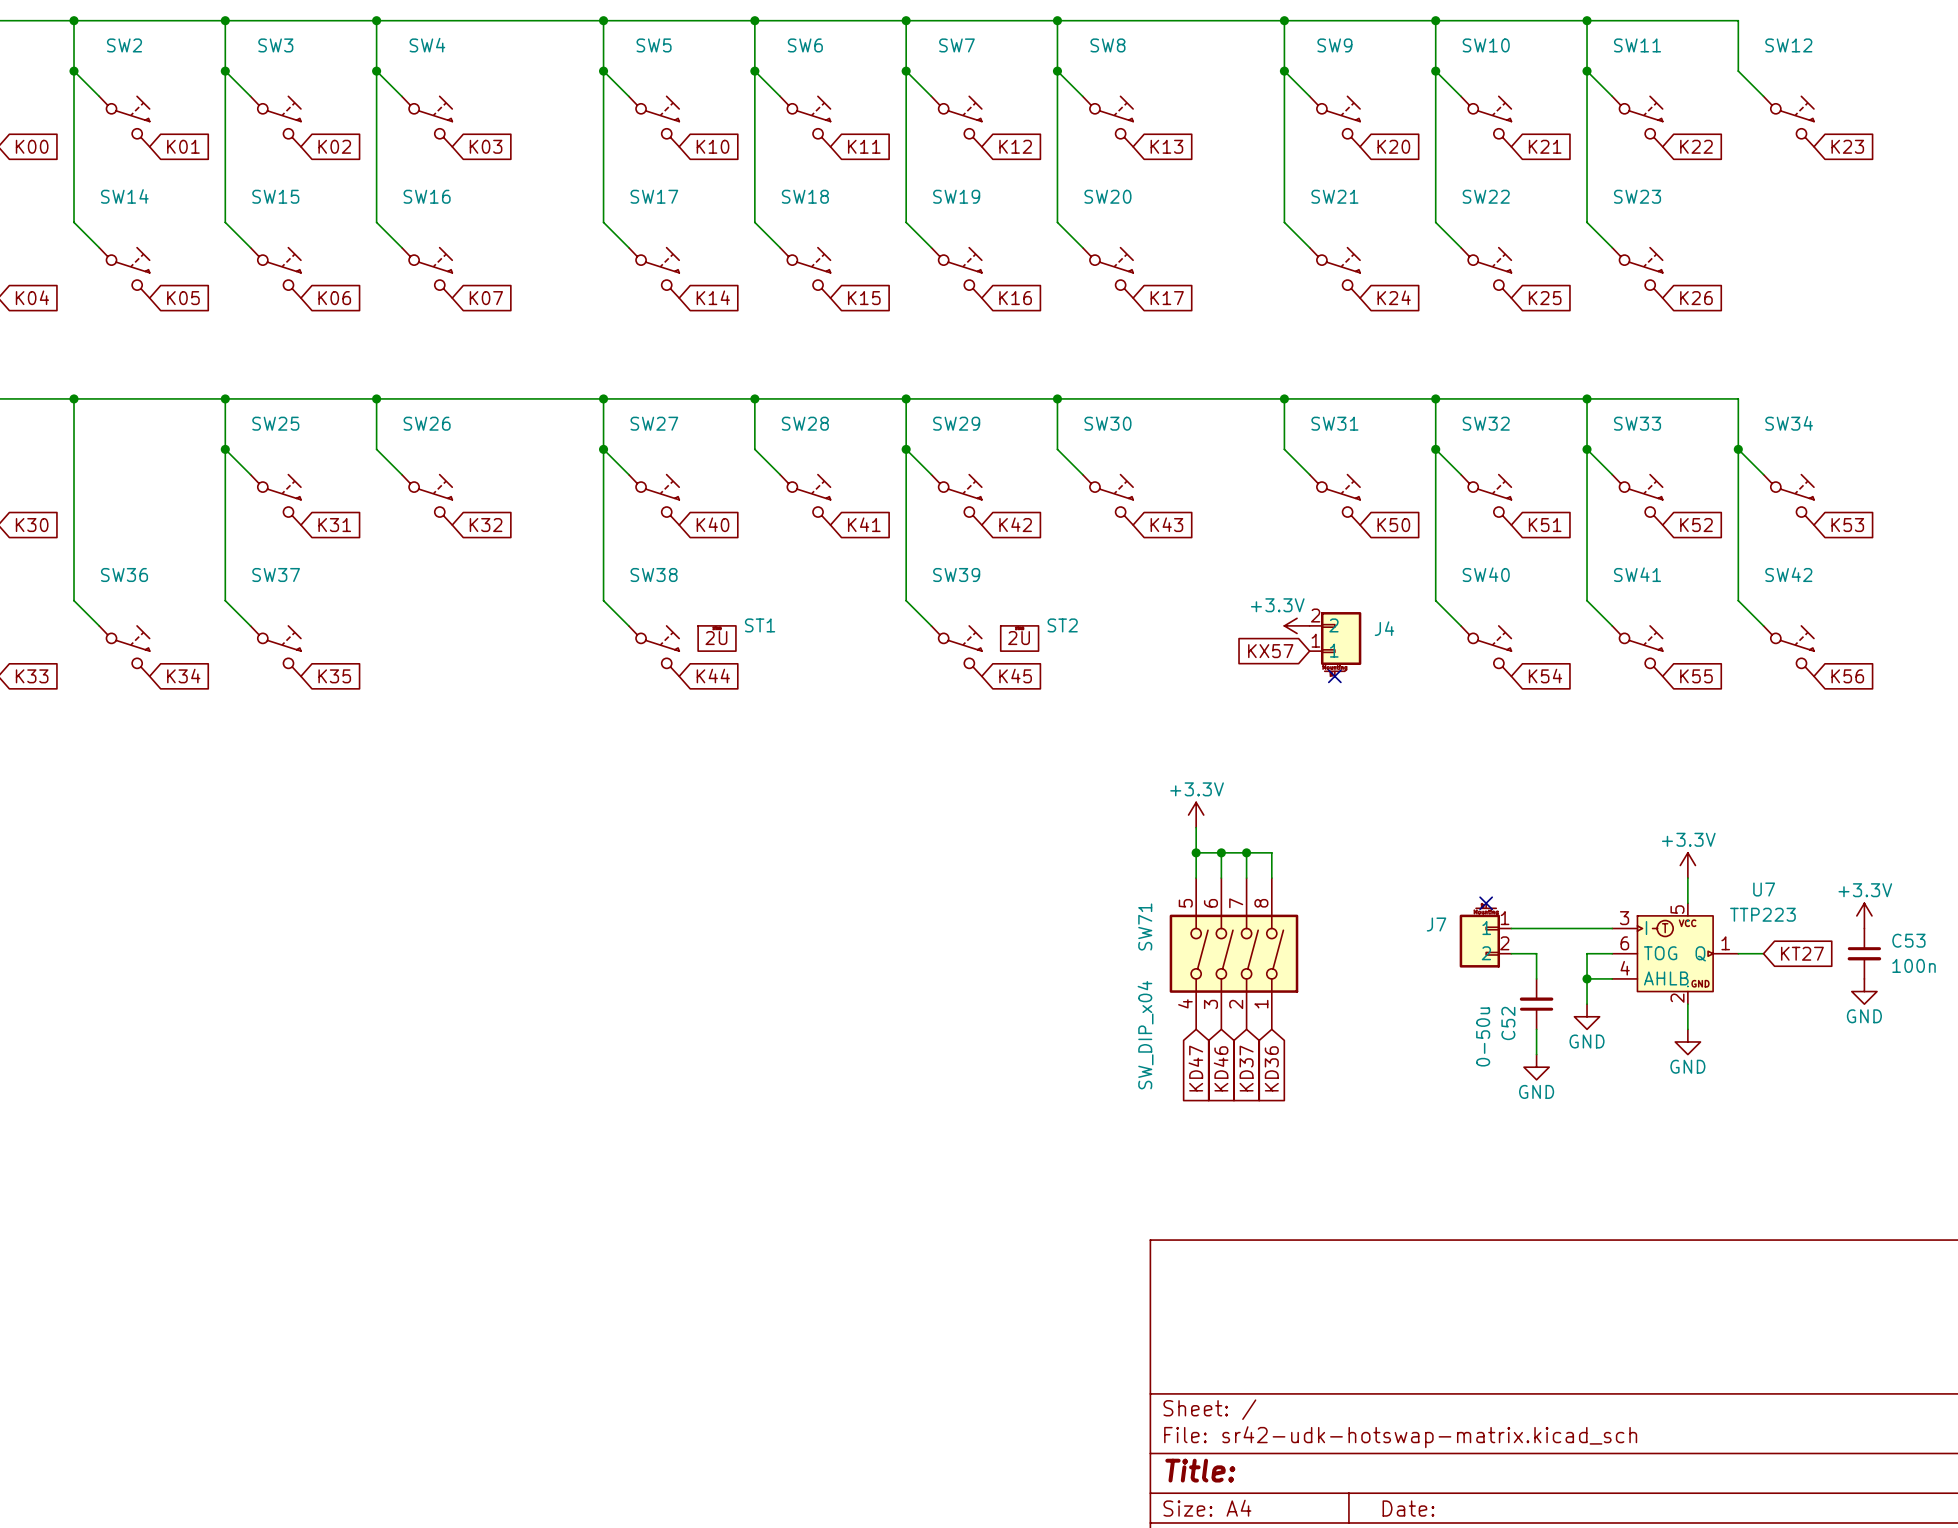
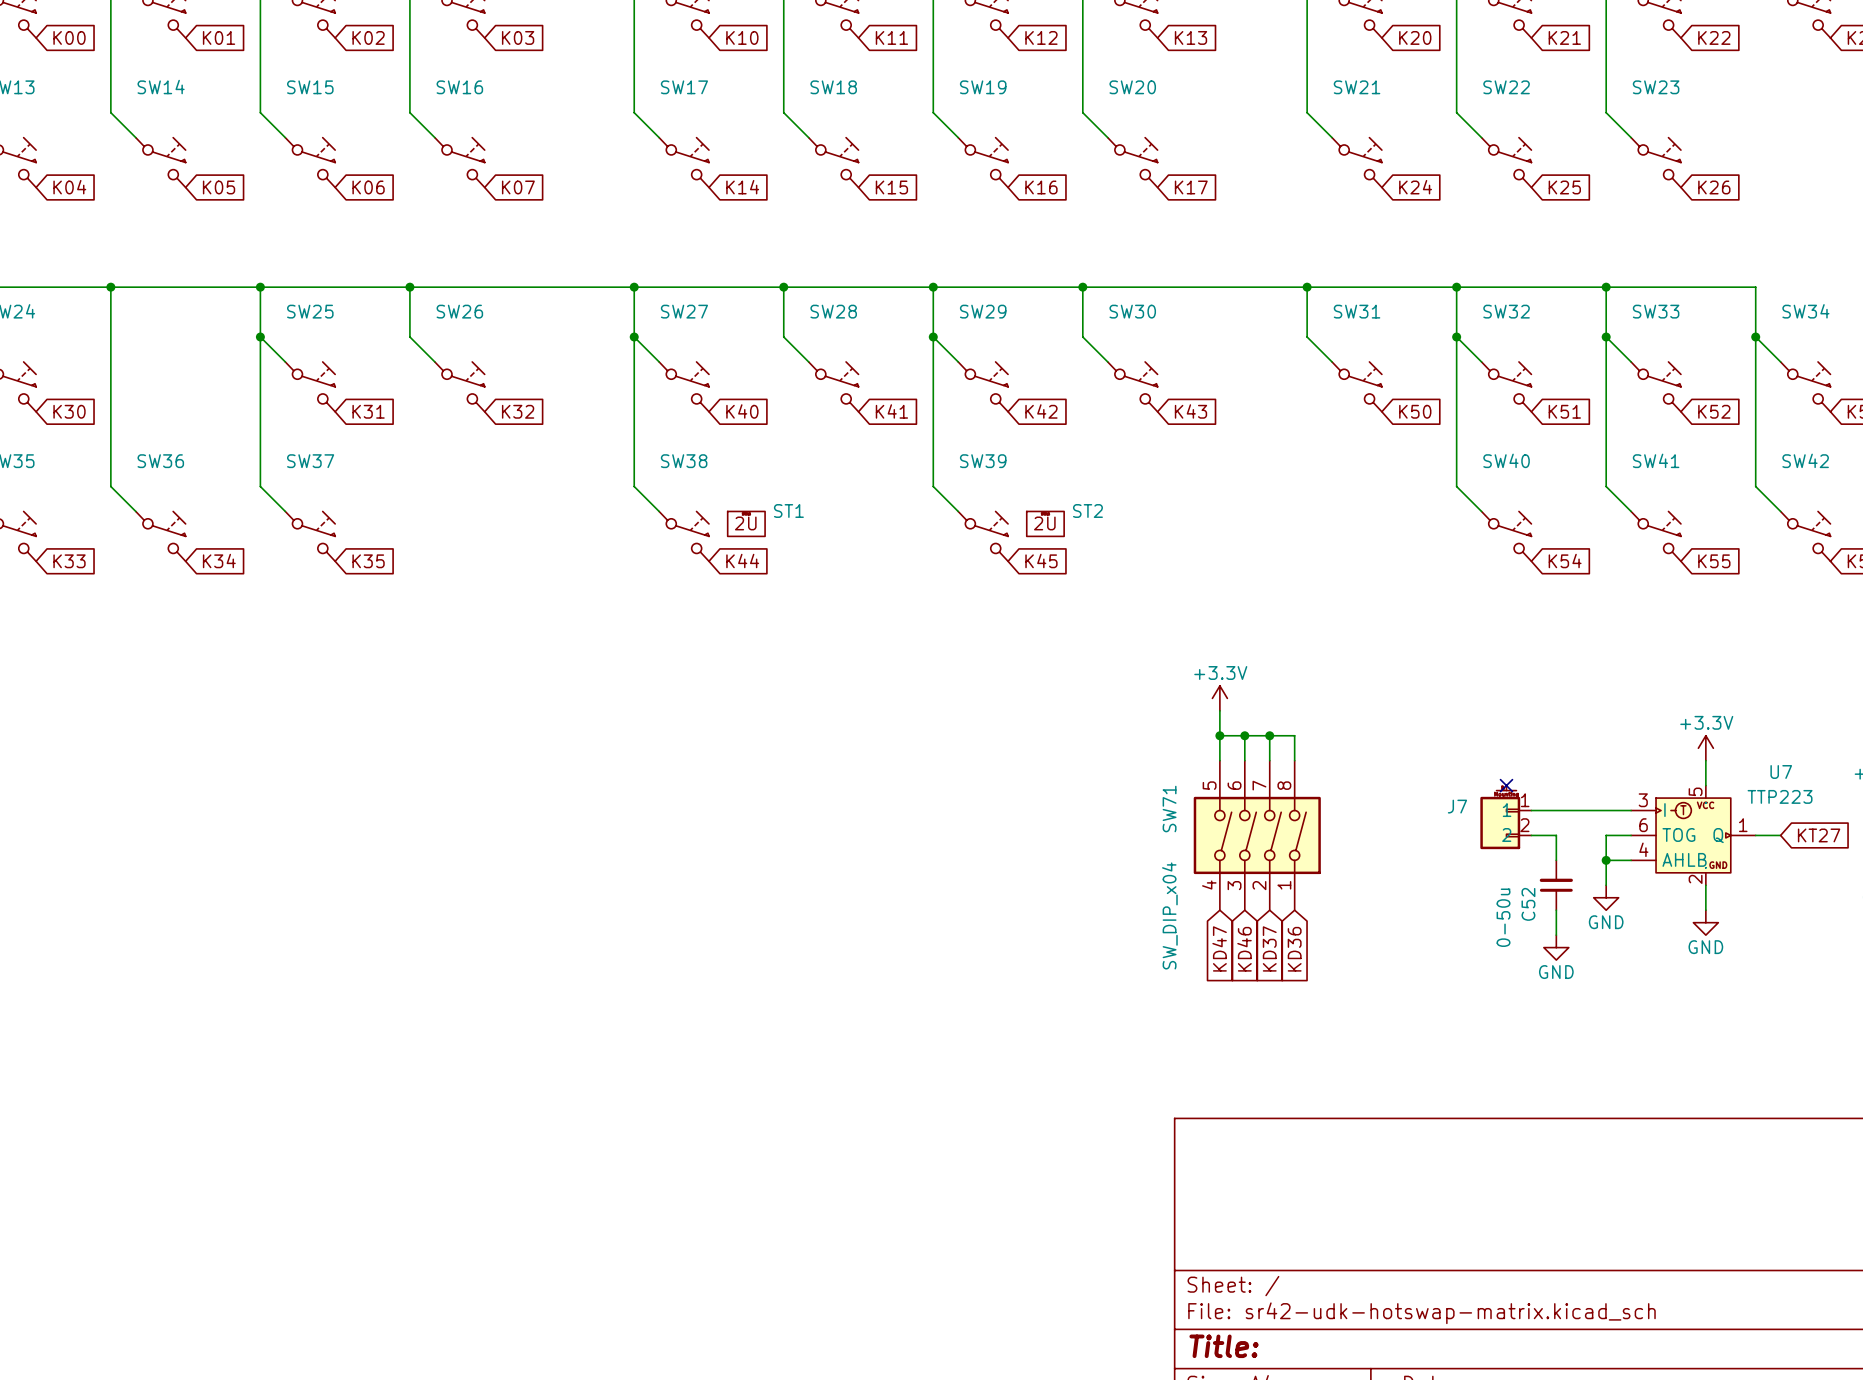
power symbol: +3.3V (1297, 625) -> none
J4: (1335, 644) -> none
global label: KX57 (1270, 651) -> none
no-connect mark: (1334, 676) -> none

